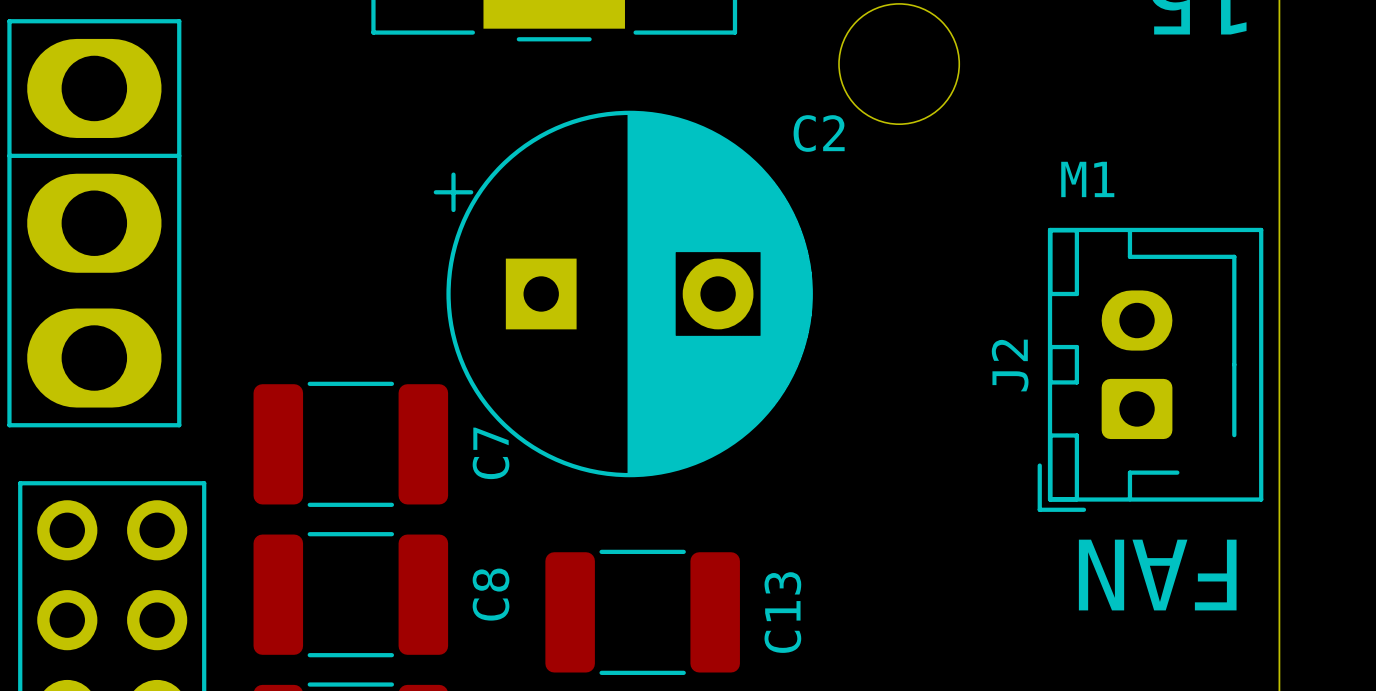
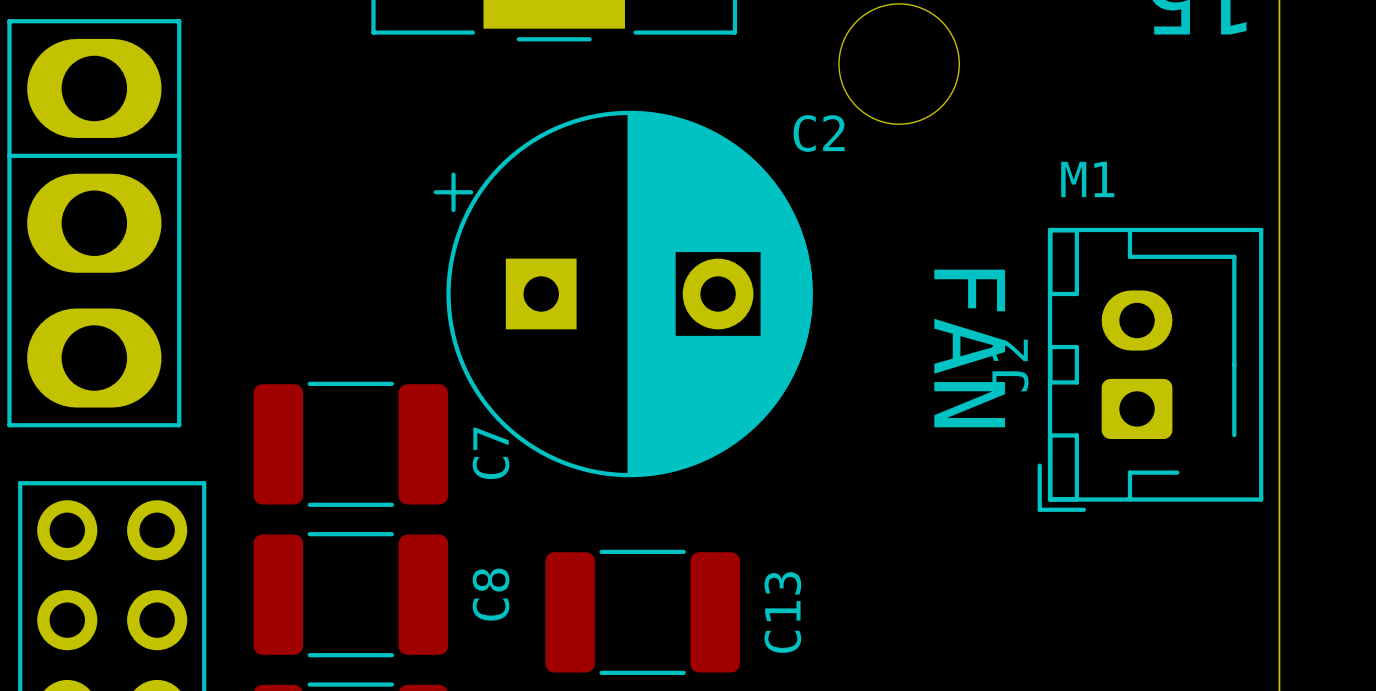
text rotation: 0° (1157, 575) -> 90° counterclockwise (969, 348)
text position: FAN (1157, 575) -> FAN (969, 348)

